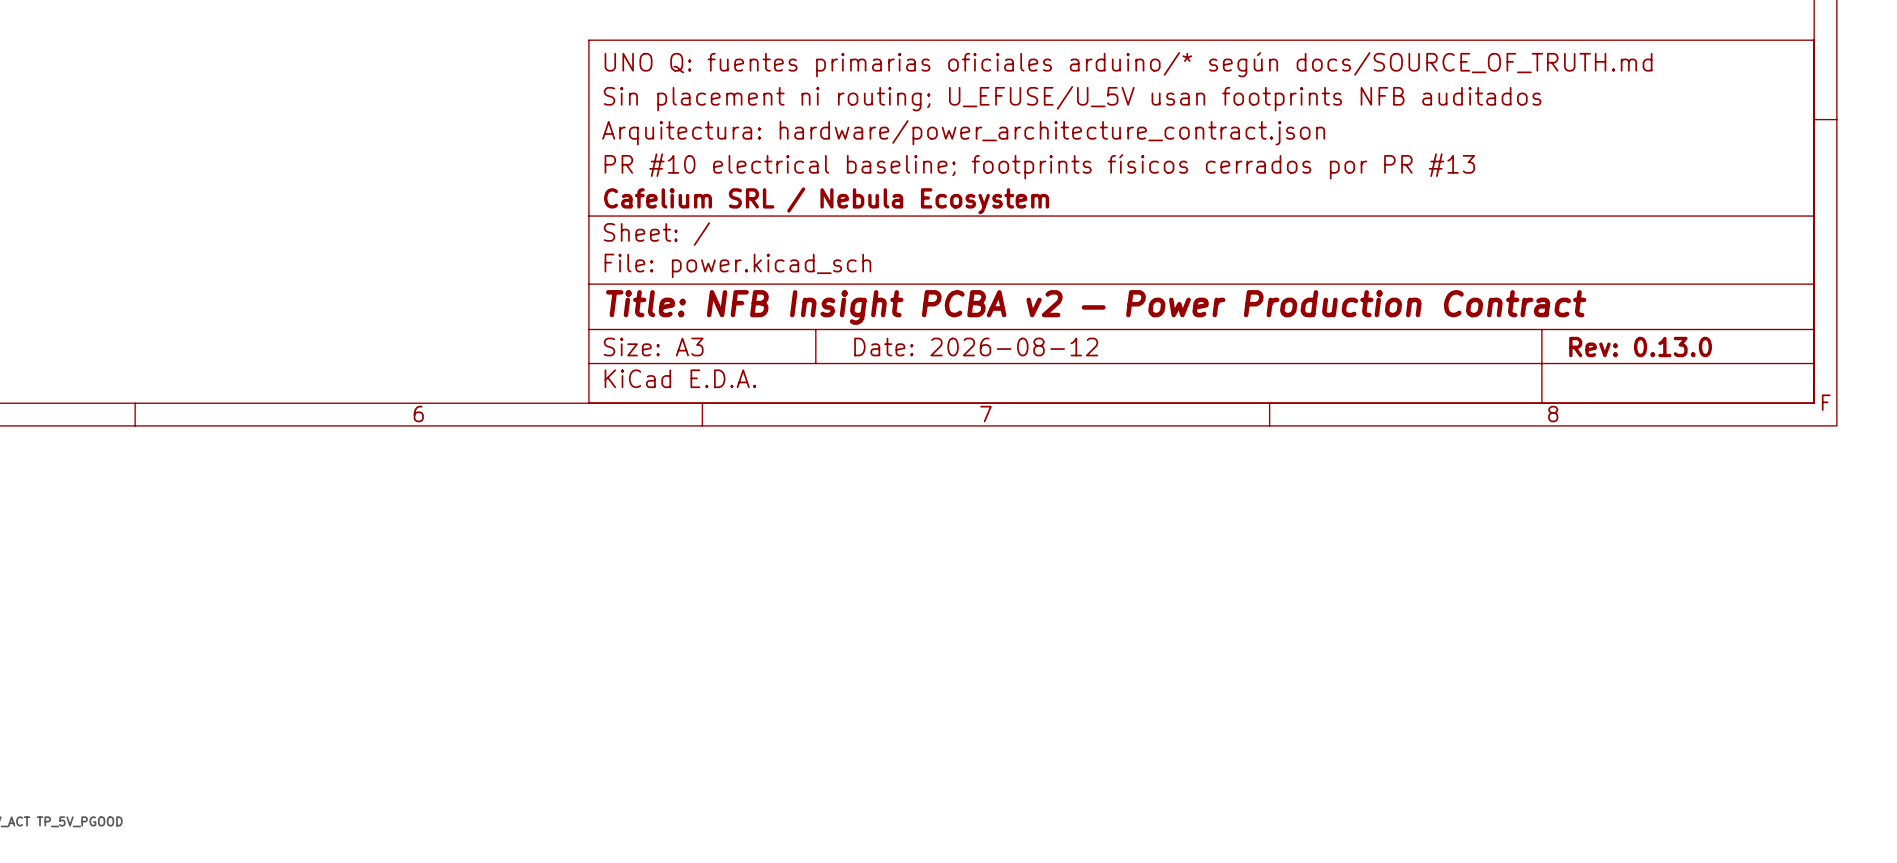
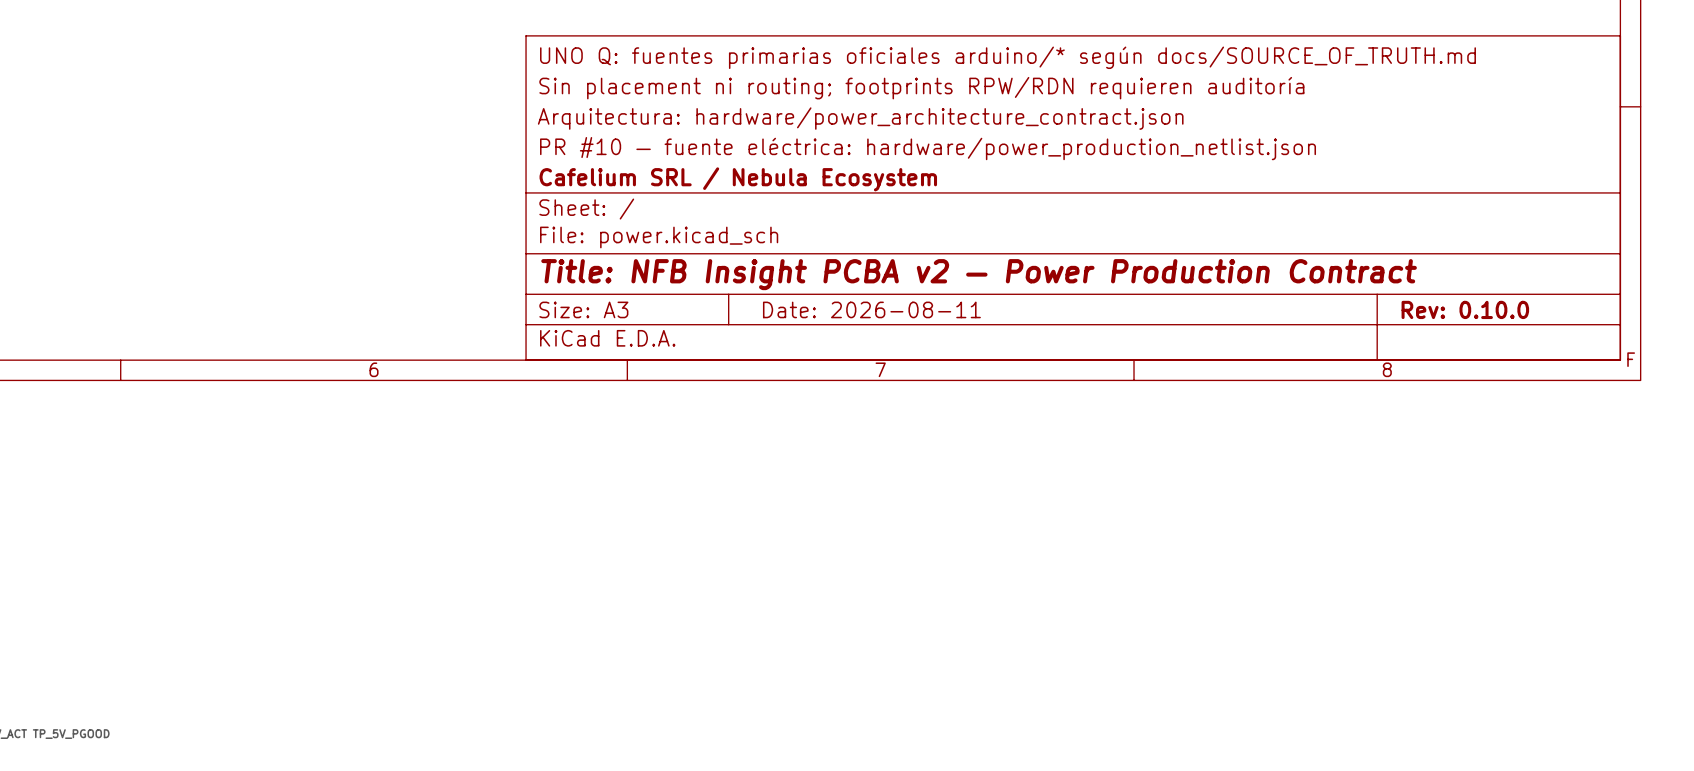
title block: Sin placement ni routing; U_EFUSE/U_5V usan footprints NFB auditados (1072, 98) -> Sin placement ni routing; footprints RPW/RDN requieren auditoría (921, 88)
title block: PR #10 electrical baseline; footprints físicos cerrados por PR #13 (1039, 166) -> PR #10 — fuente eléctrica: hardware/power_production_netlist.json (928, 148)
title block: Date: 2026-08-12 (976, 347) -> Date: 2026-08-11 (871, 309)
title block: Rev: 0.13.0 (1640, 347) -> Rev: 0.10.0 (1465, 309)

